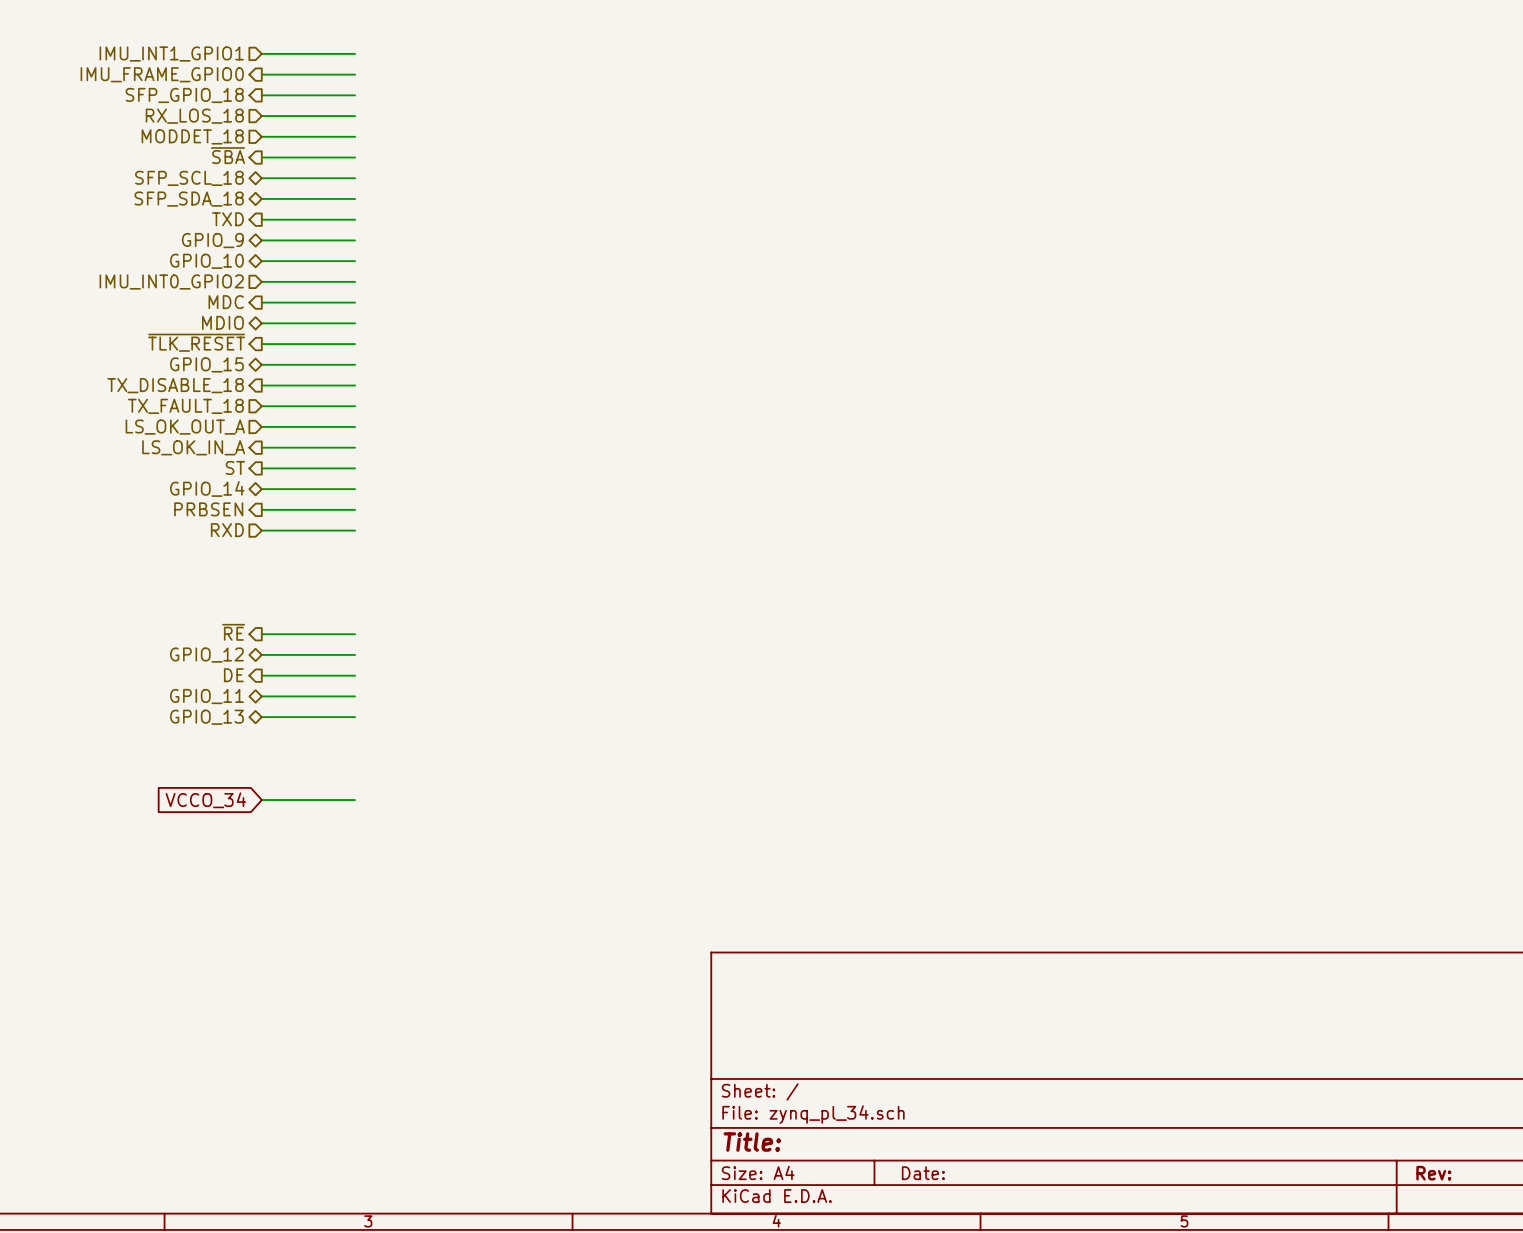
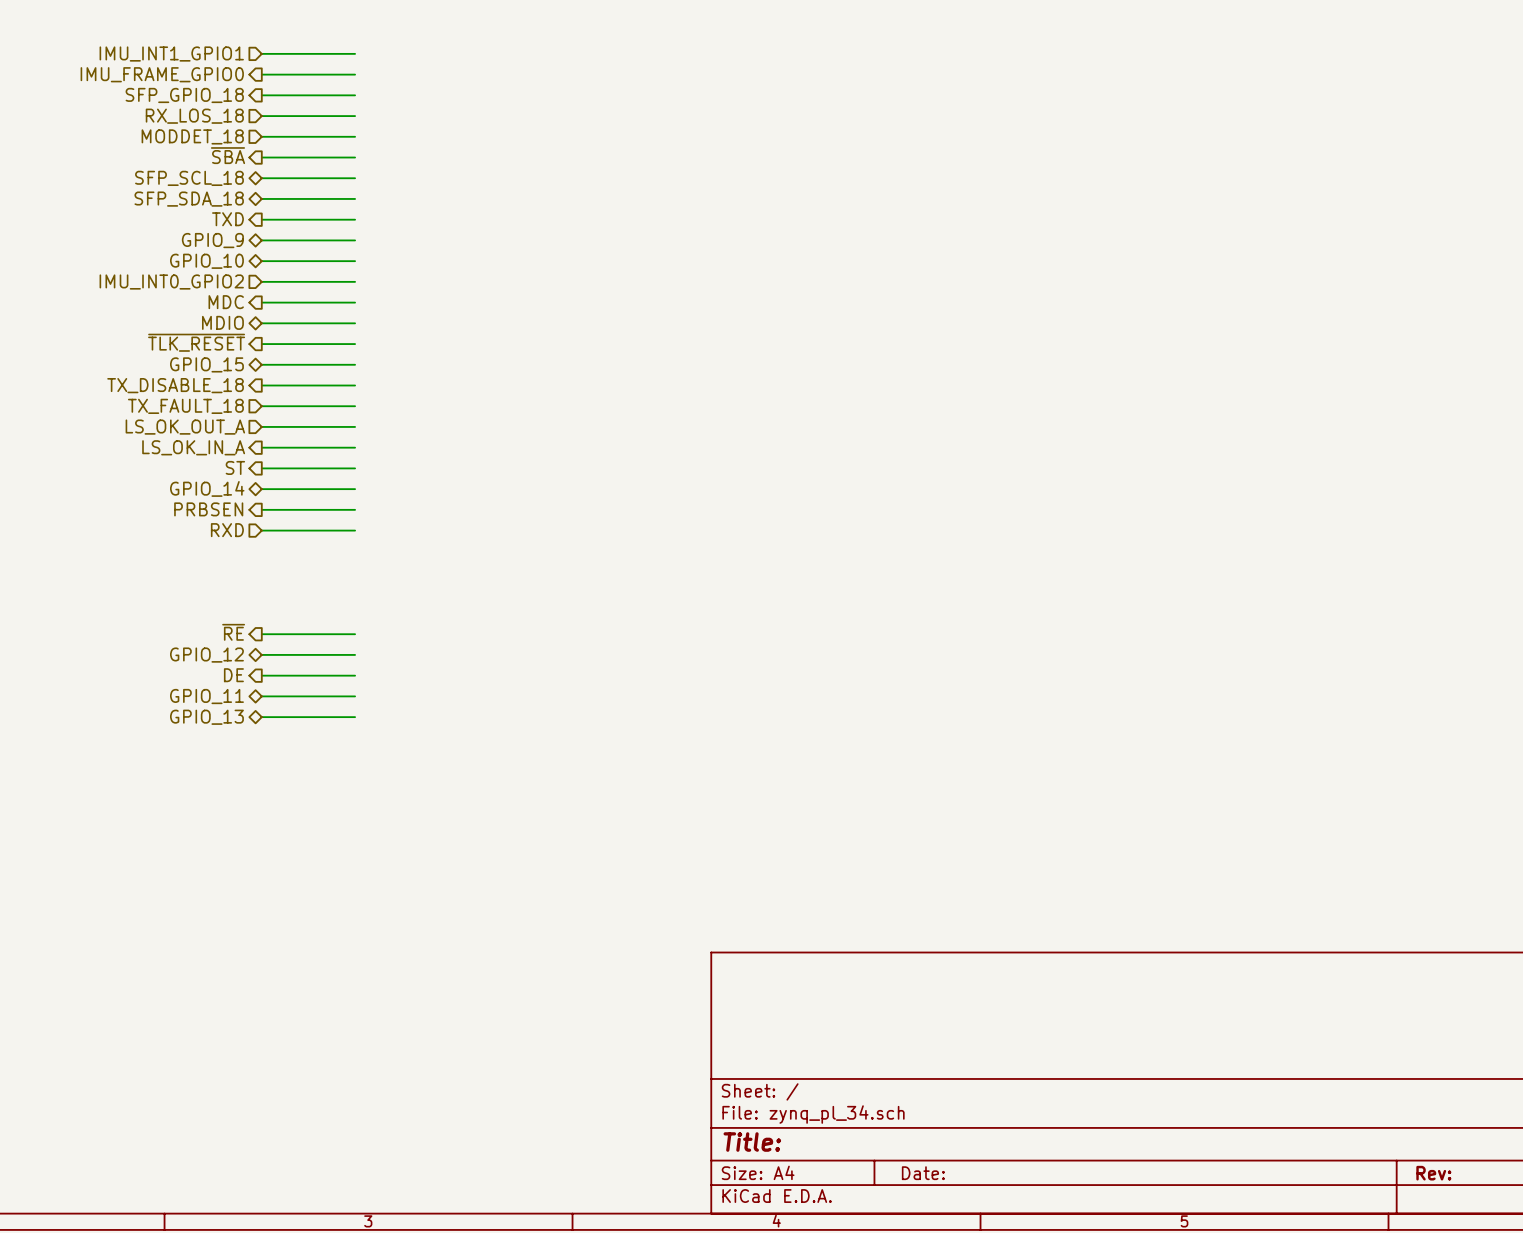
global label: VCCO_34 (205, 800) -> none
wire: (261, 800) (355, 800) -> none

